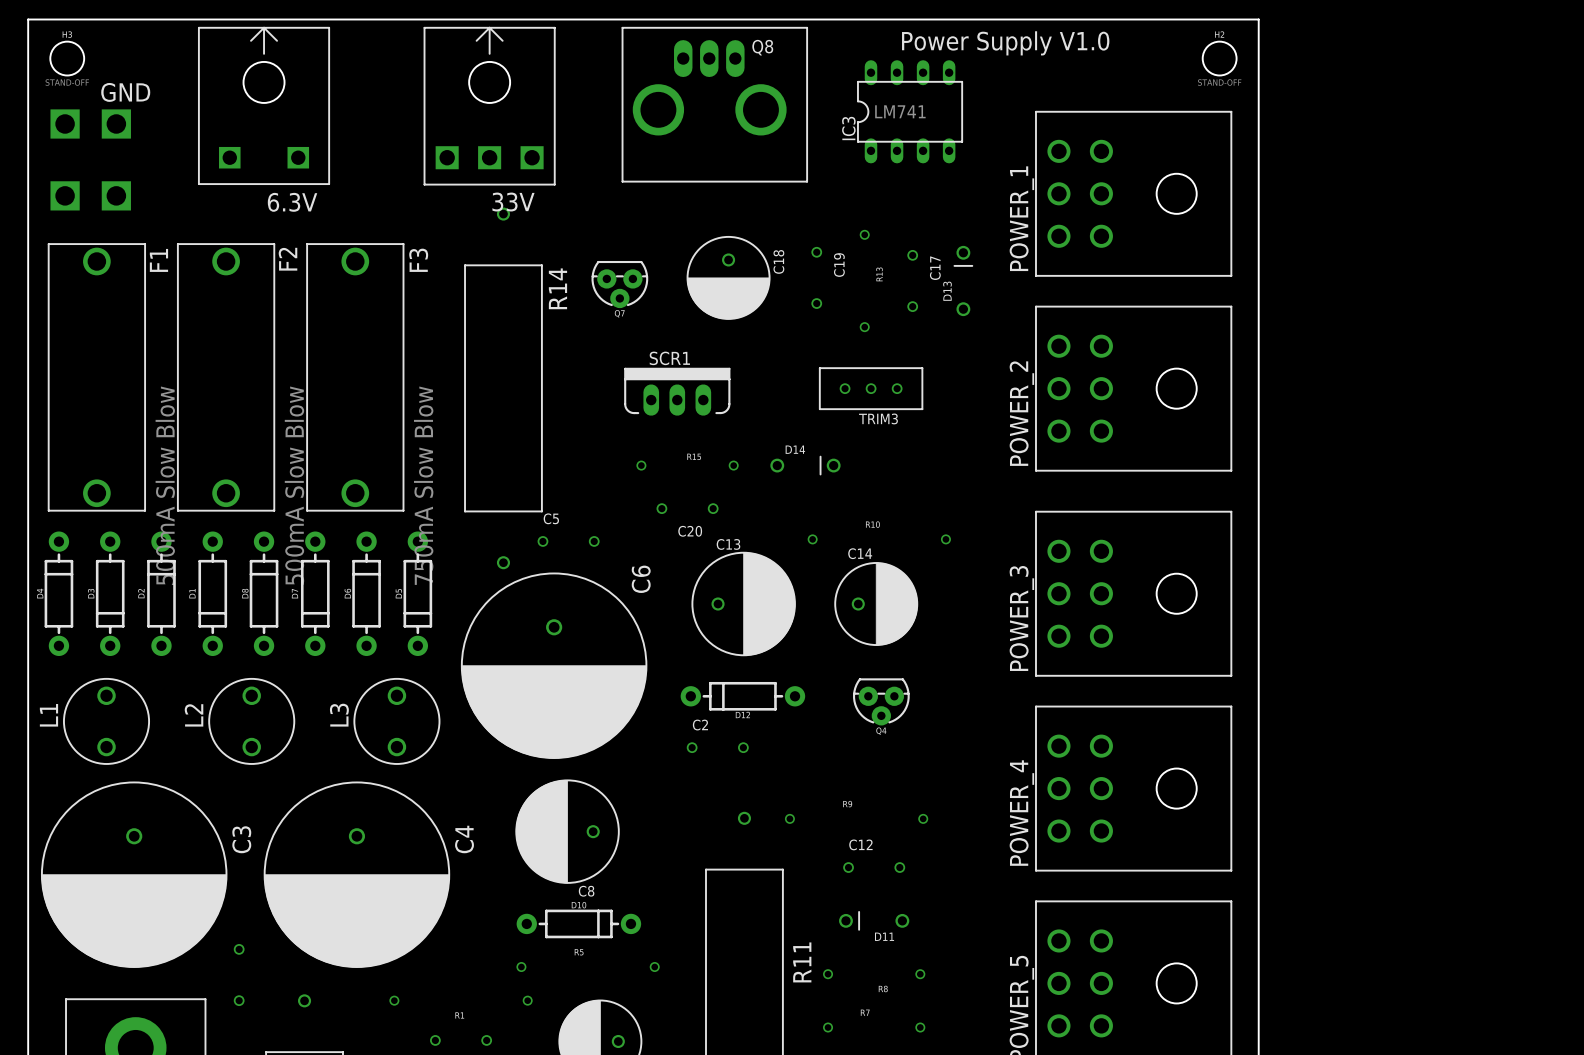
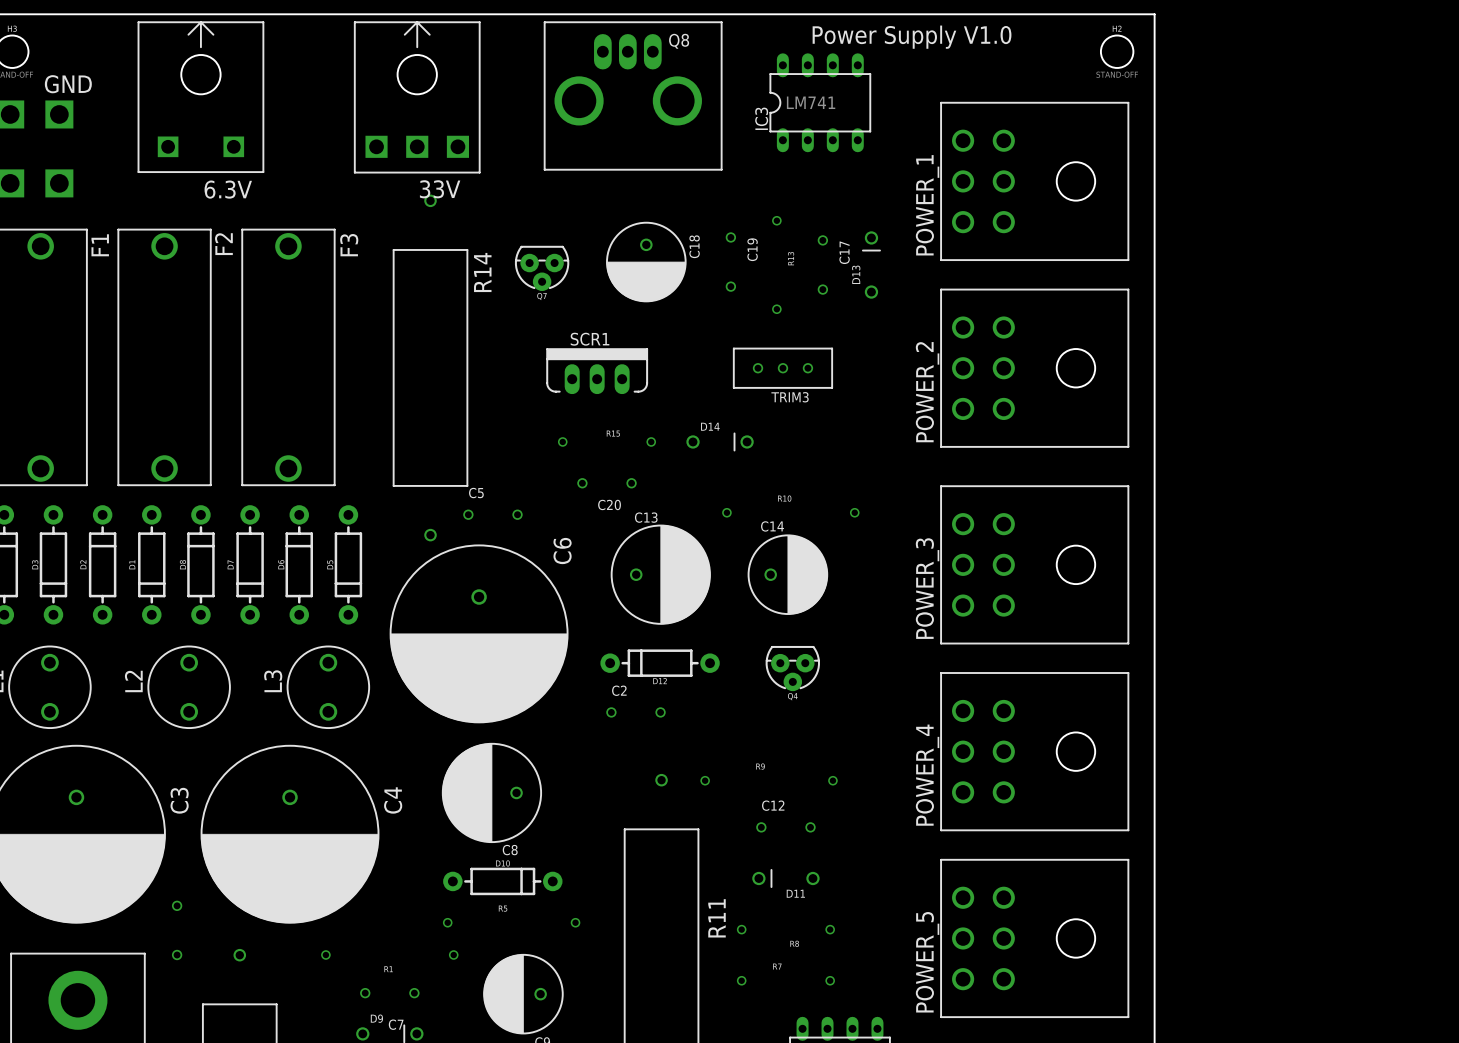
F1 value: 500mA Slow Blow (165, 485) -> none
F2 value: 500mA Slow Blow (294, 485) -> none
F3 value: 750mA Slow Blow (423, 485) -> none

